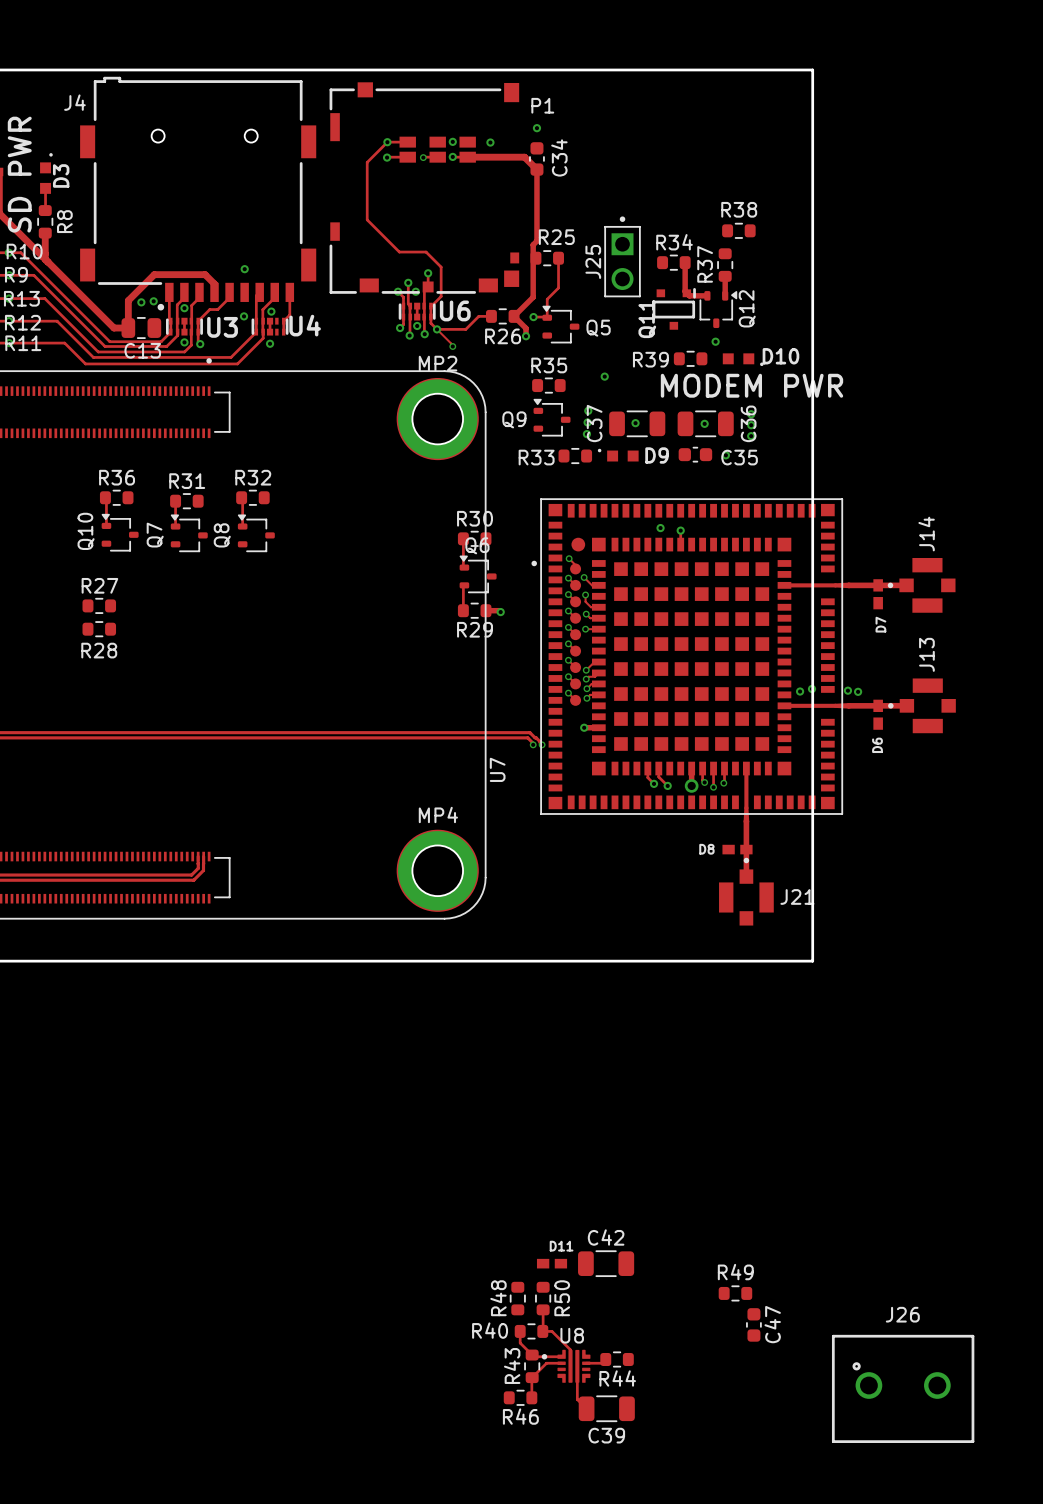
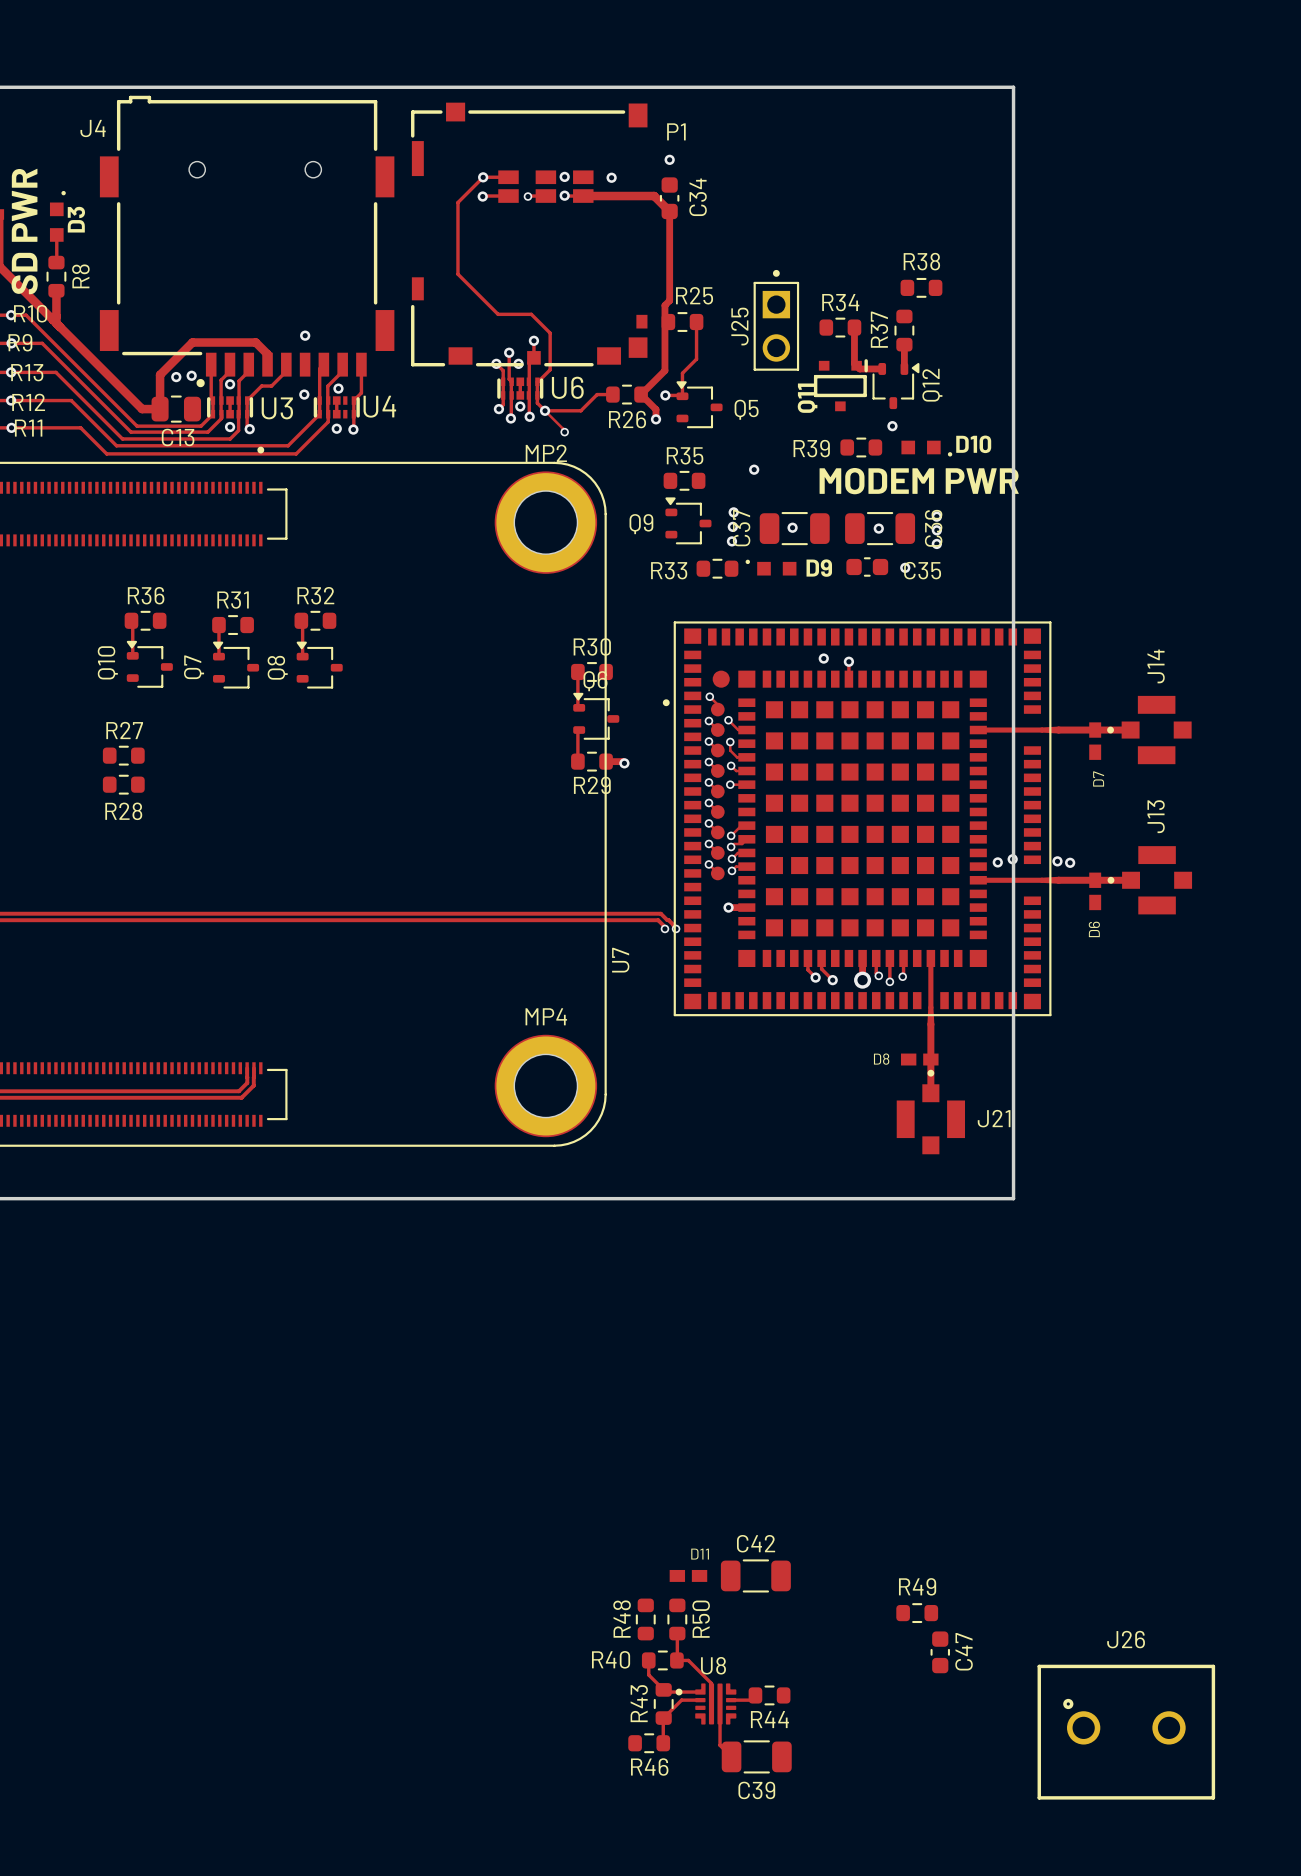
track: none -> (353, 414) (353, 429)
via: none -> (353, 429)

